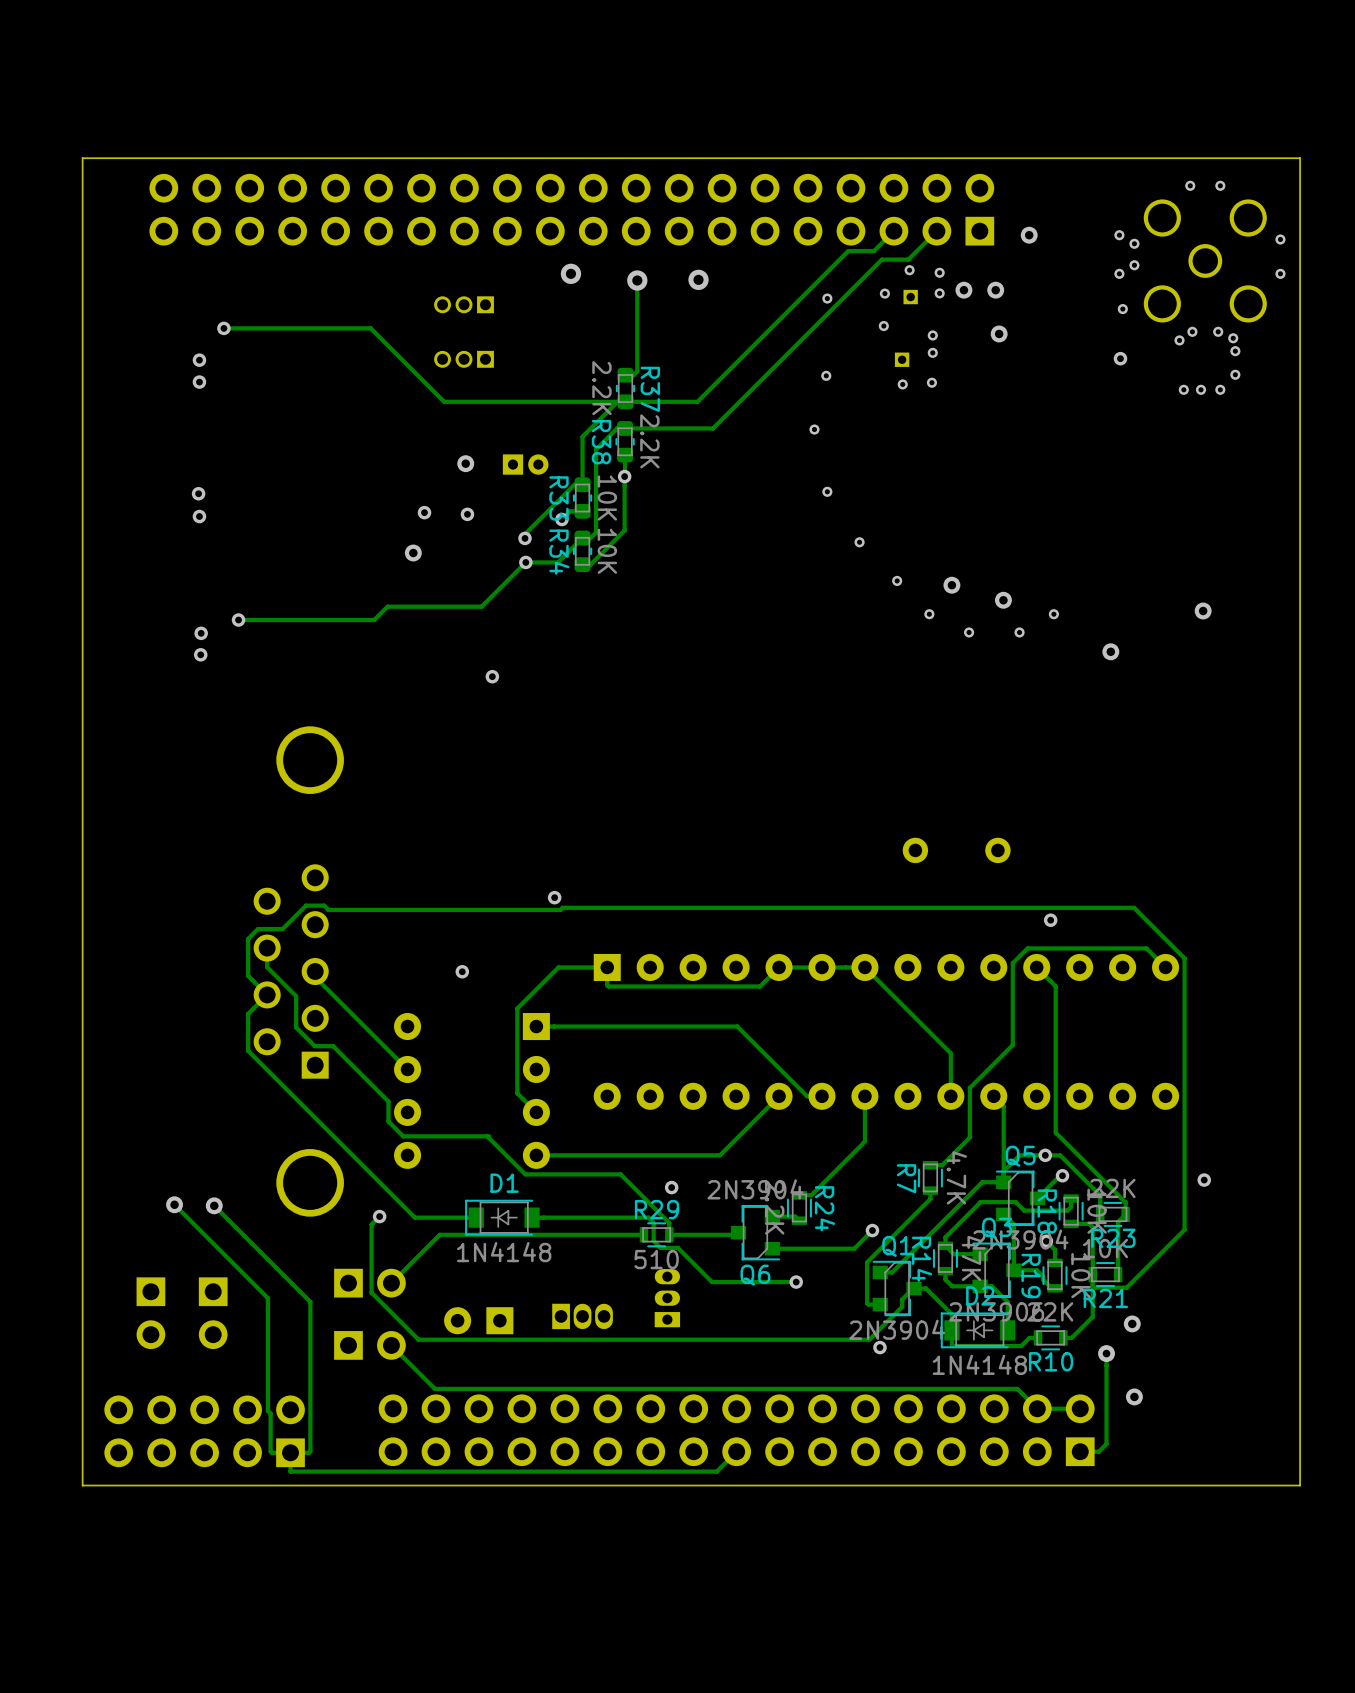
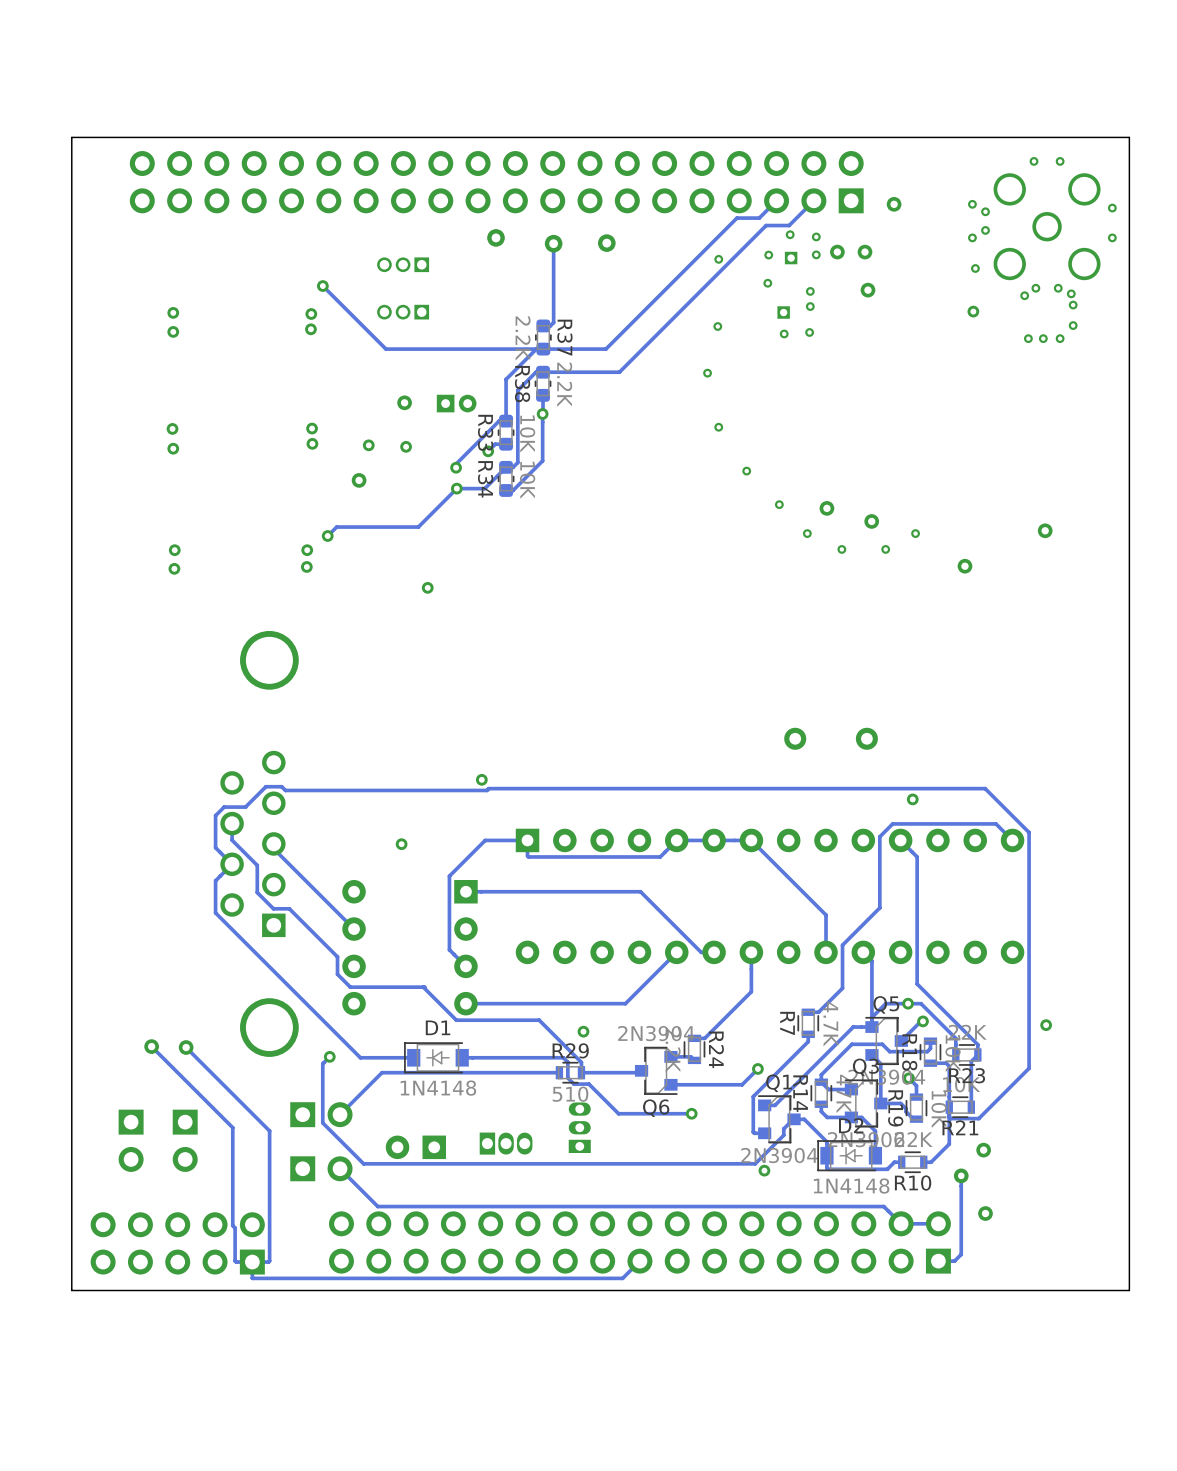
track: (223, 328) (371, 329) -> none
via: (223, 328) -> none
via: none -> (322, 286)
via: none -> (311, 314)
via: none -> (310, 329)
via: none -> (312, 428)
via: none -> (312, 443)
track: (377, 617) (374, 620) (238, 620) -> none
via: none -> (327, 536)
via: (238, 620) -> none
via: none -> (307, 550)
via: none -> (306, 566)

